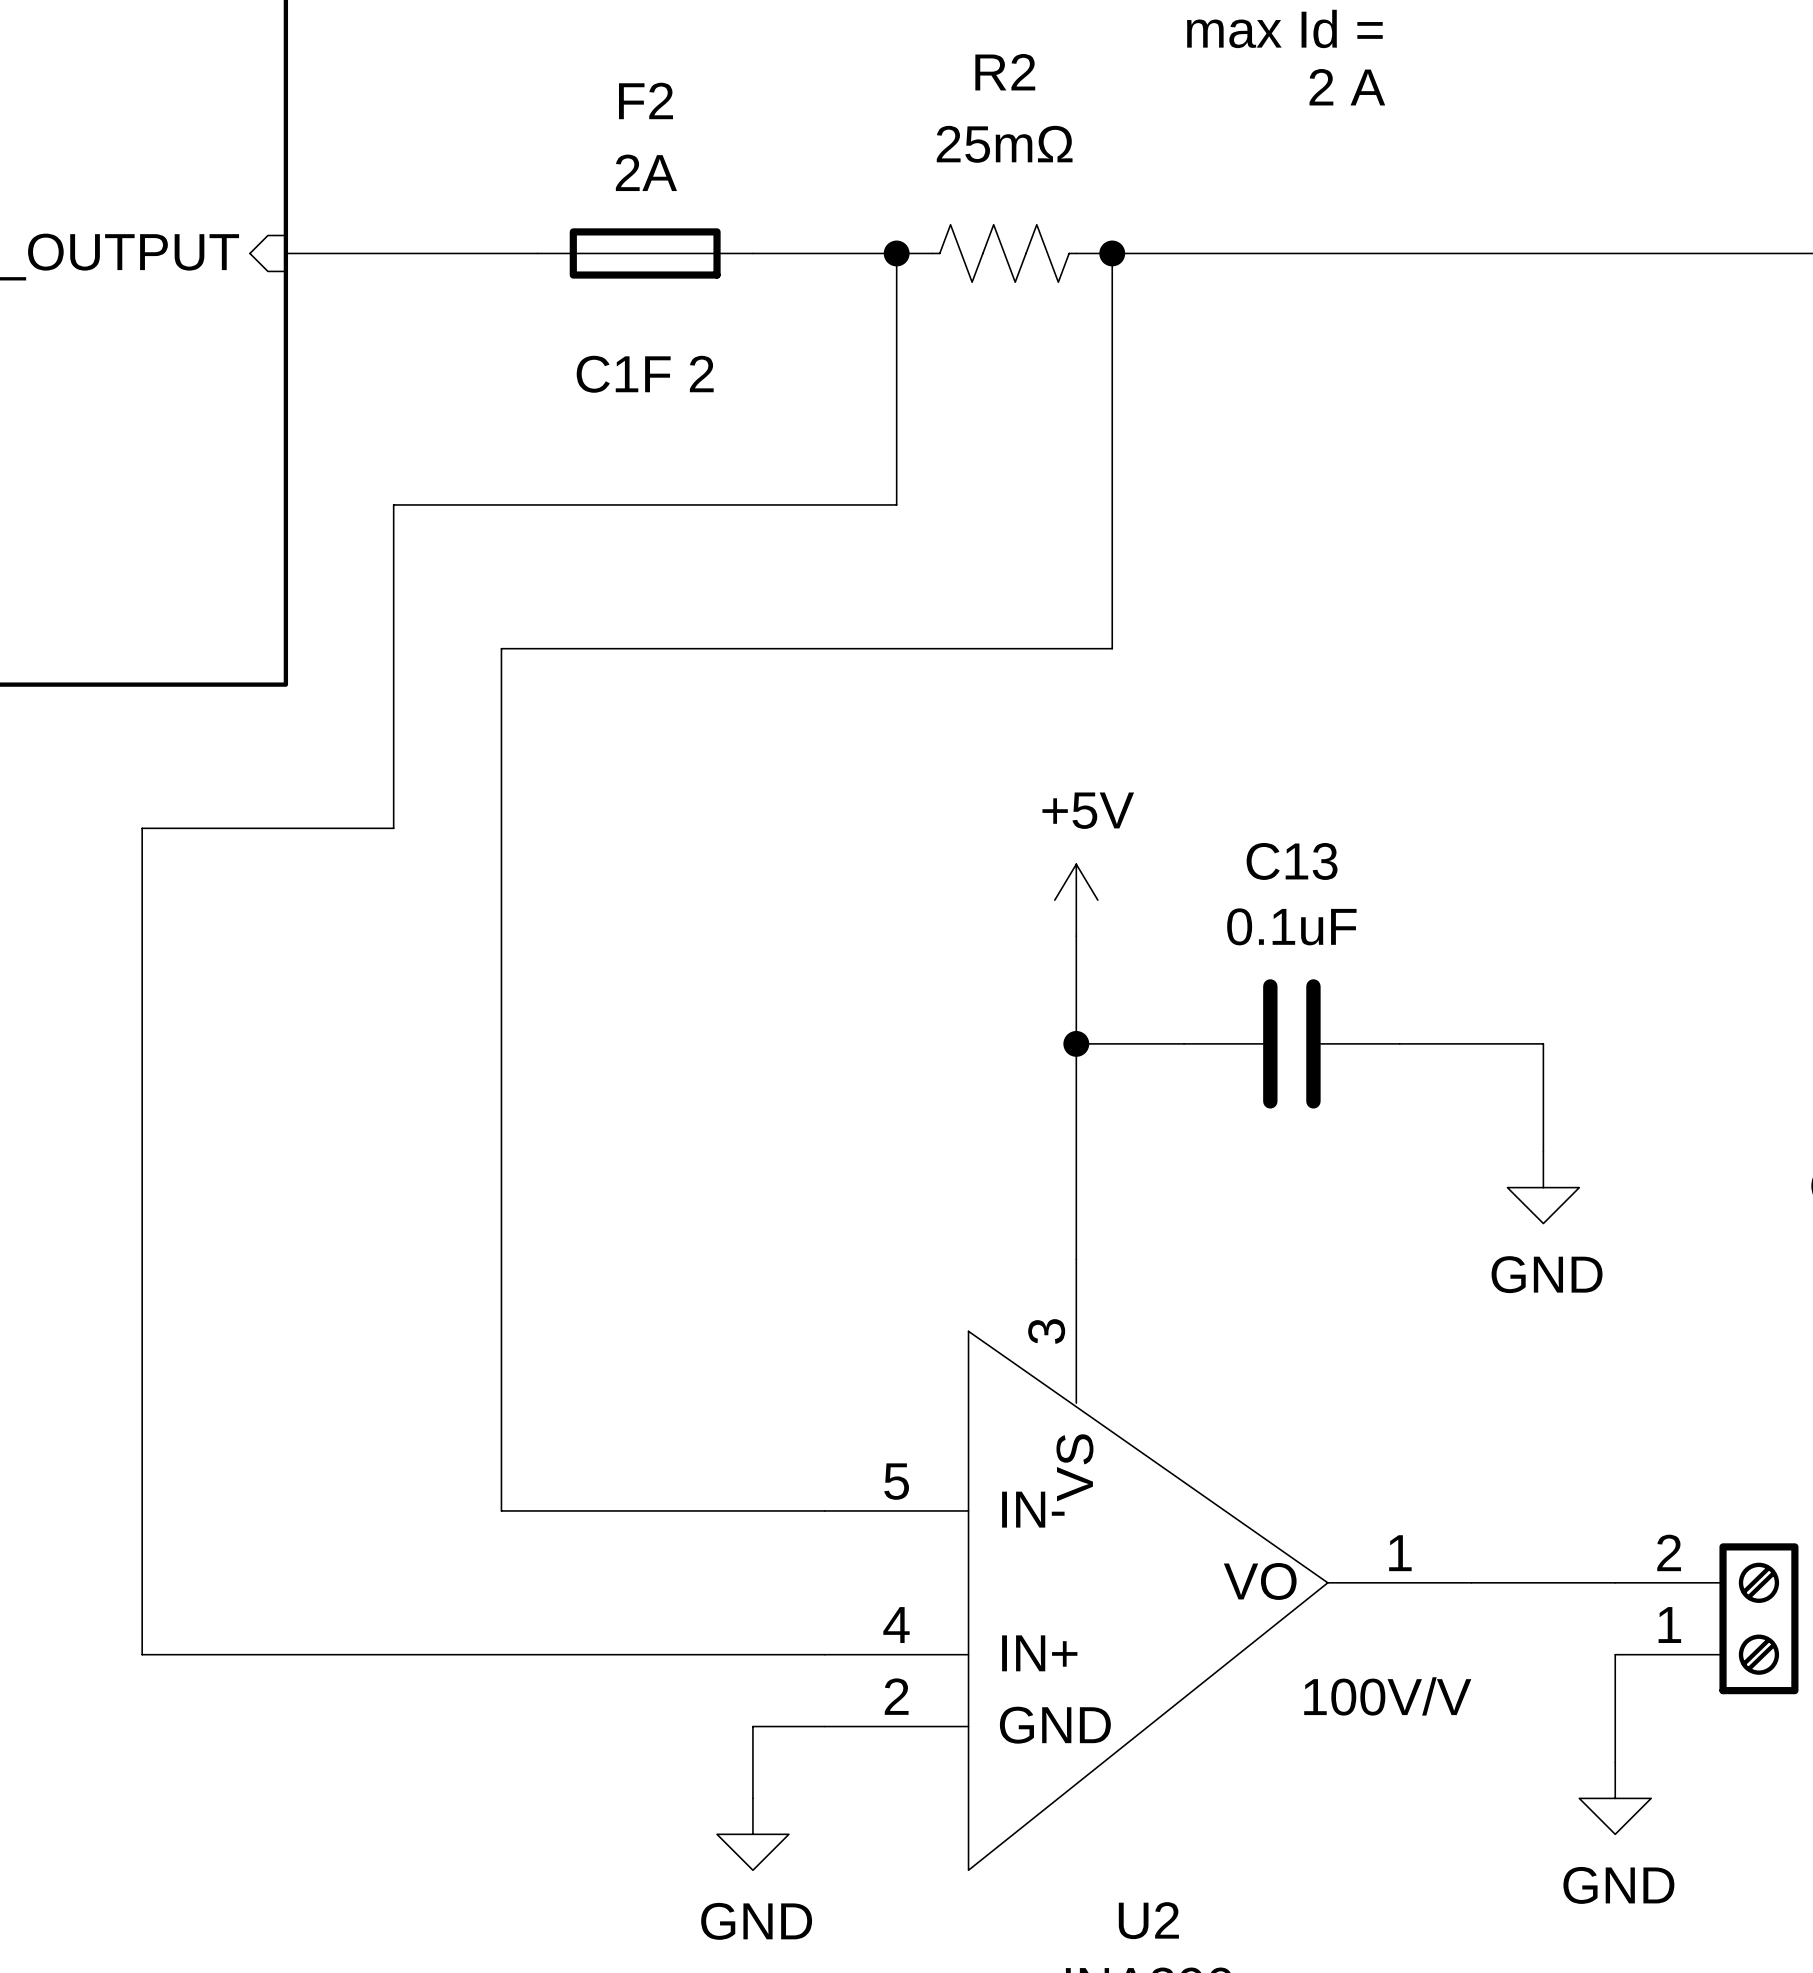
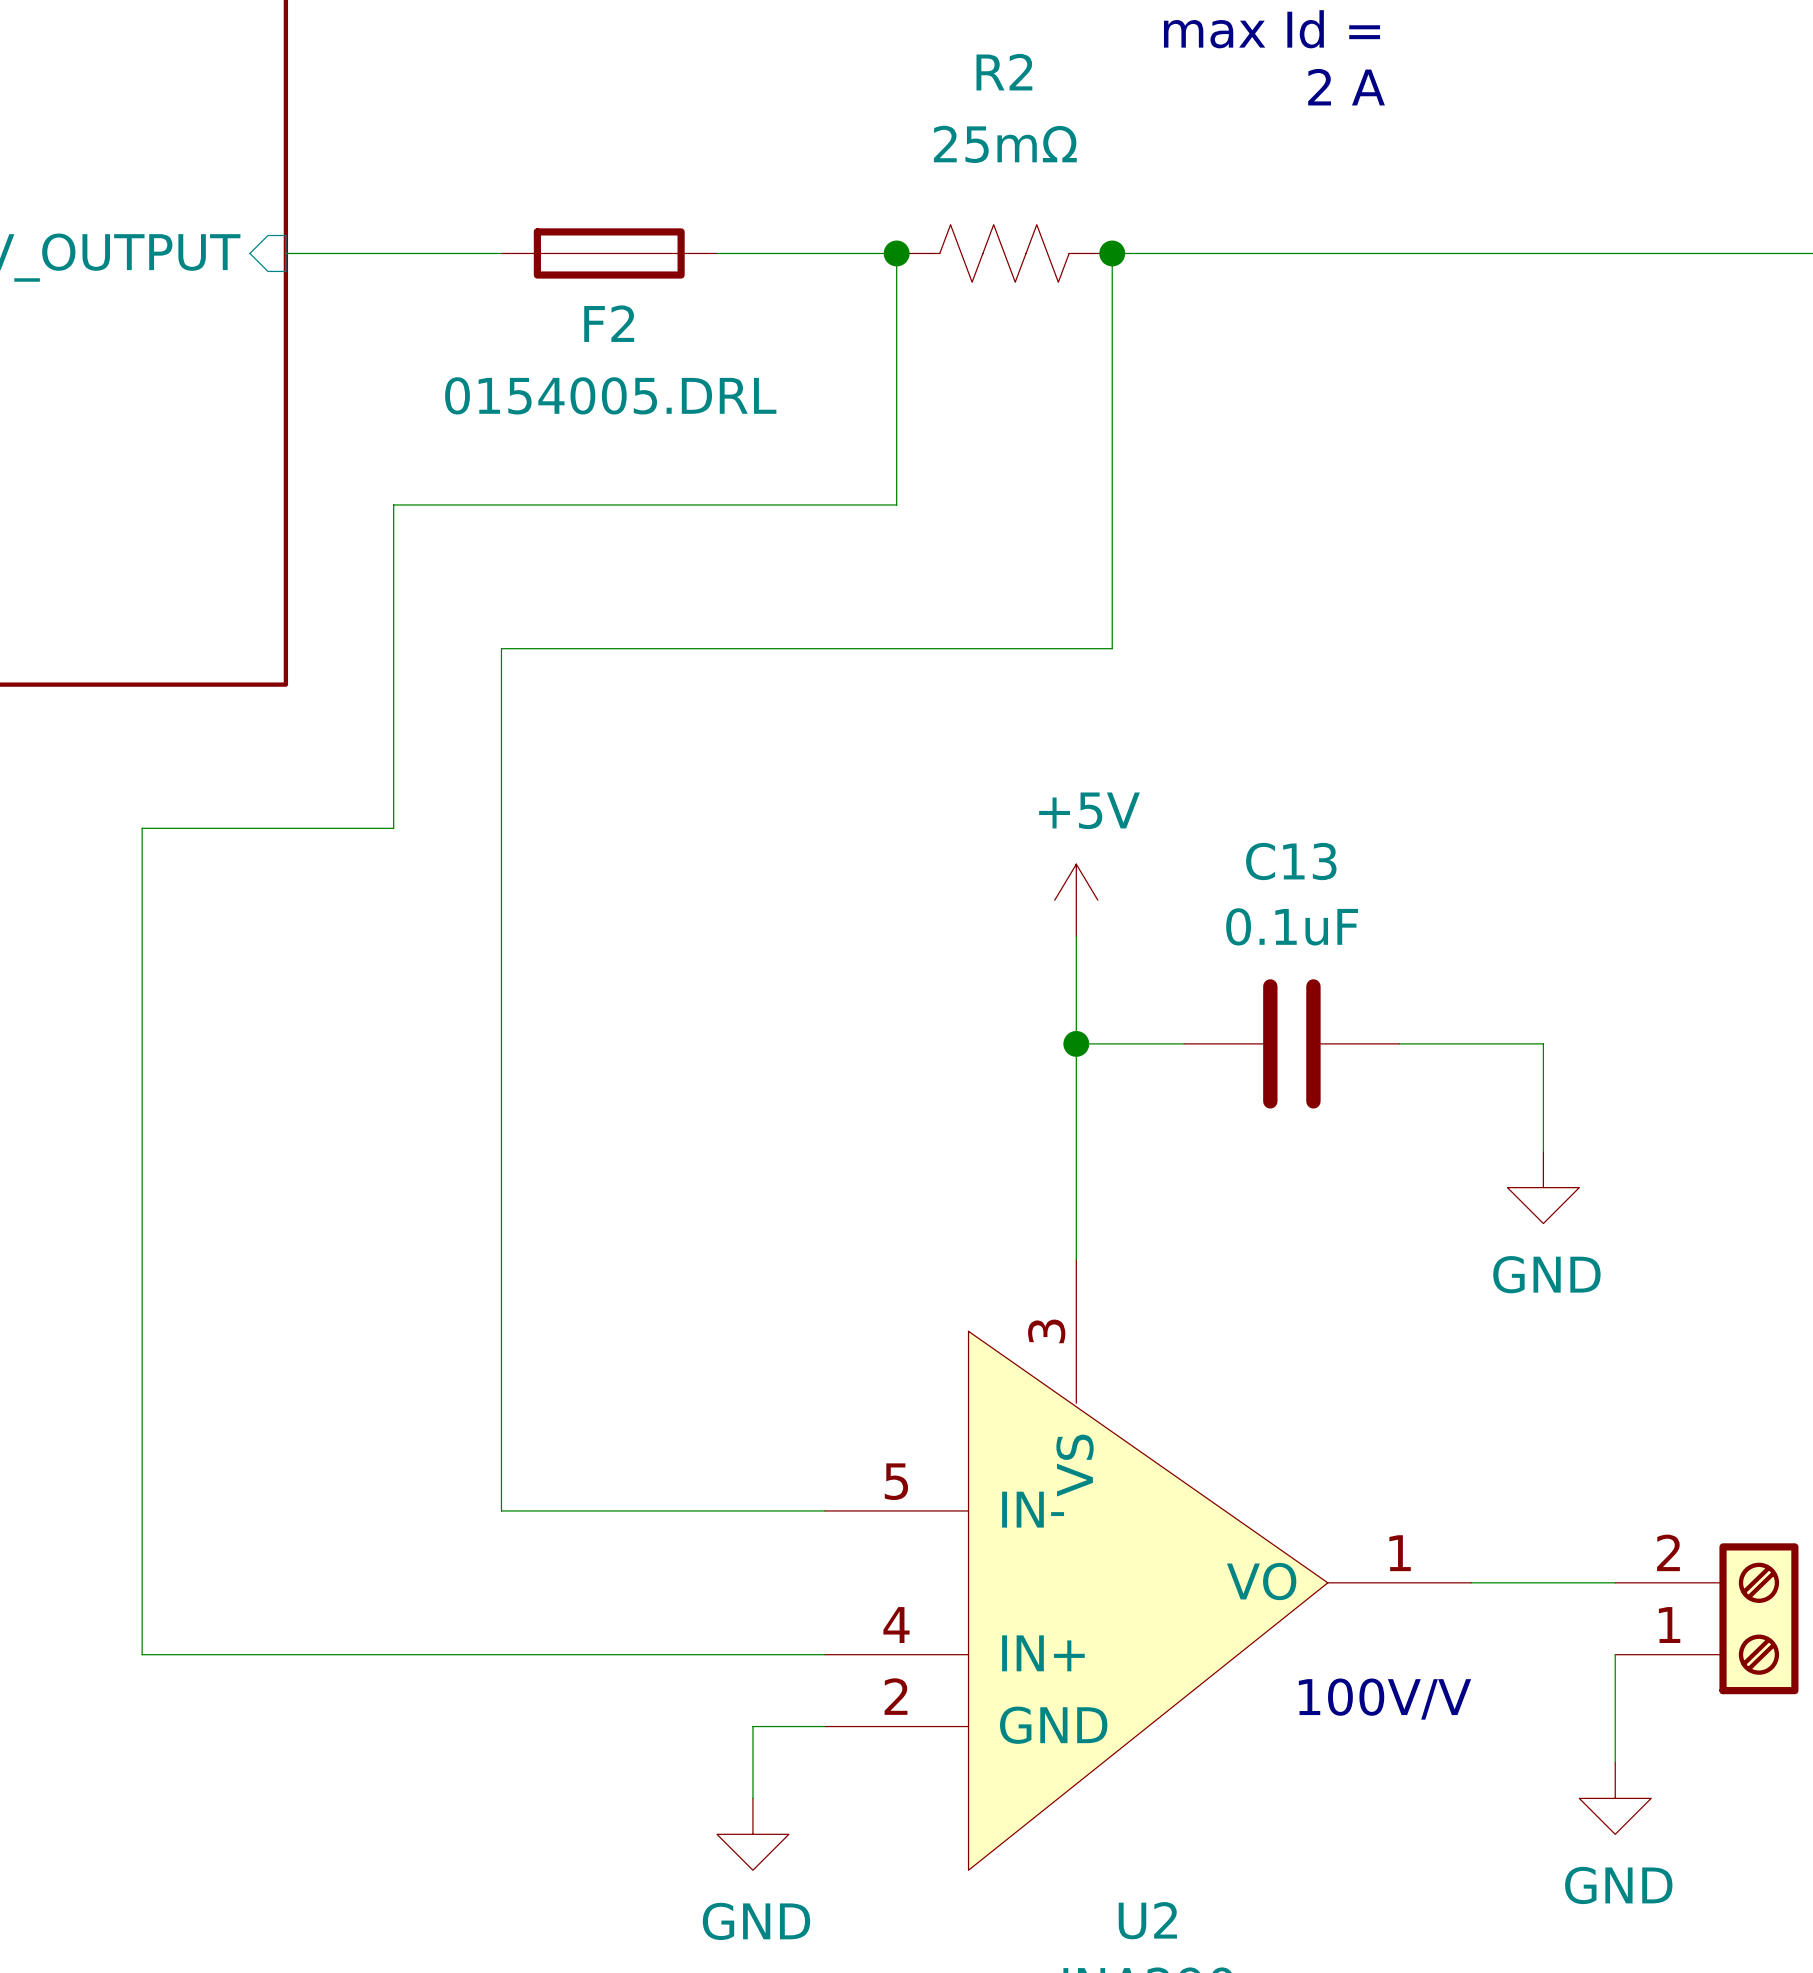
F2 name position: F2 (646, 100) -> F2 (609, 323)
F2 value: 2A (646, 172) -> 0154005.DRL (610, 395)
F2 position: (645, 253) -> (609, 253)
F2 text: C1F 2 (645, 374) -> none

